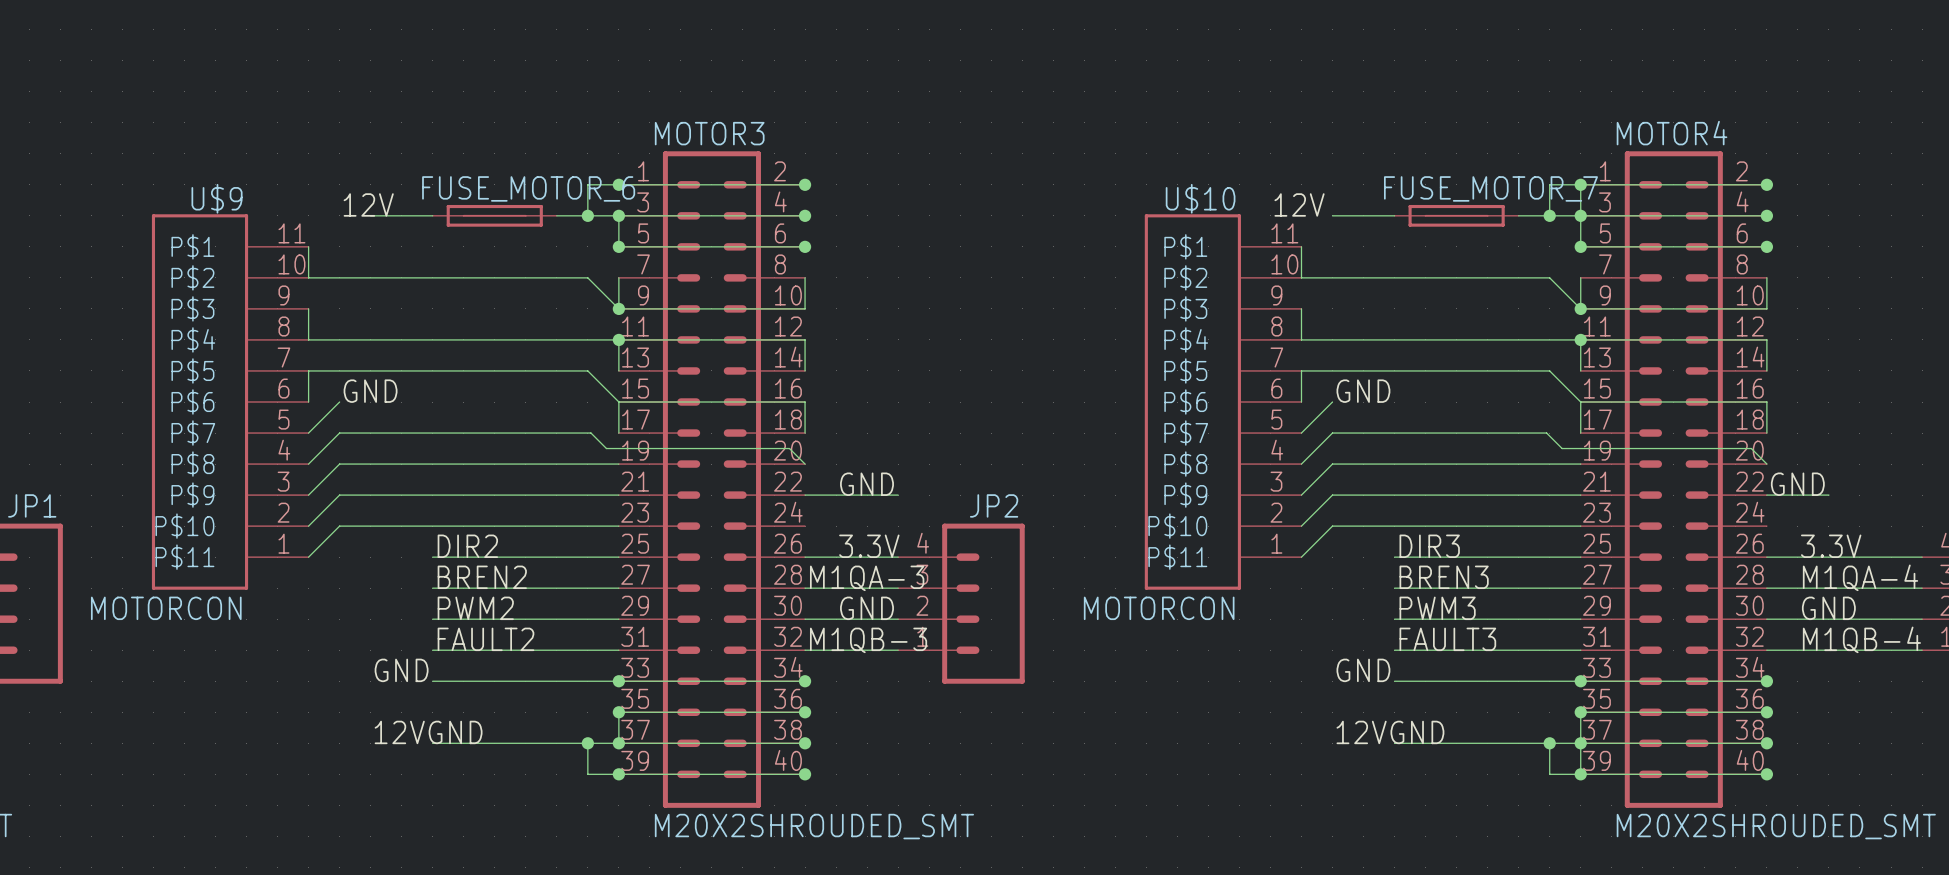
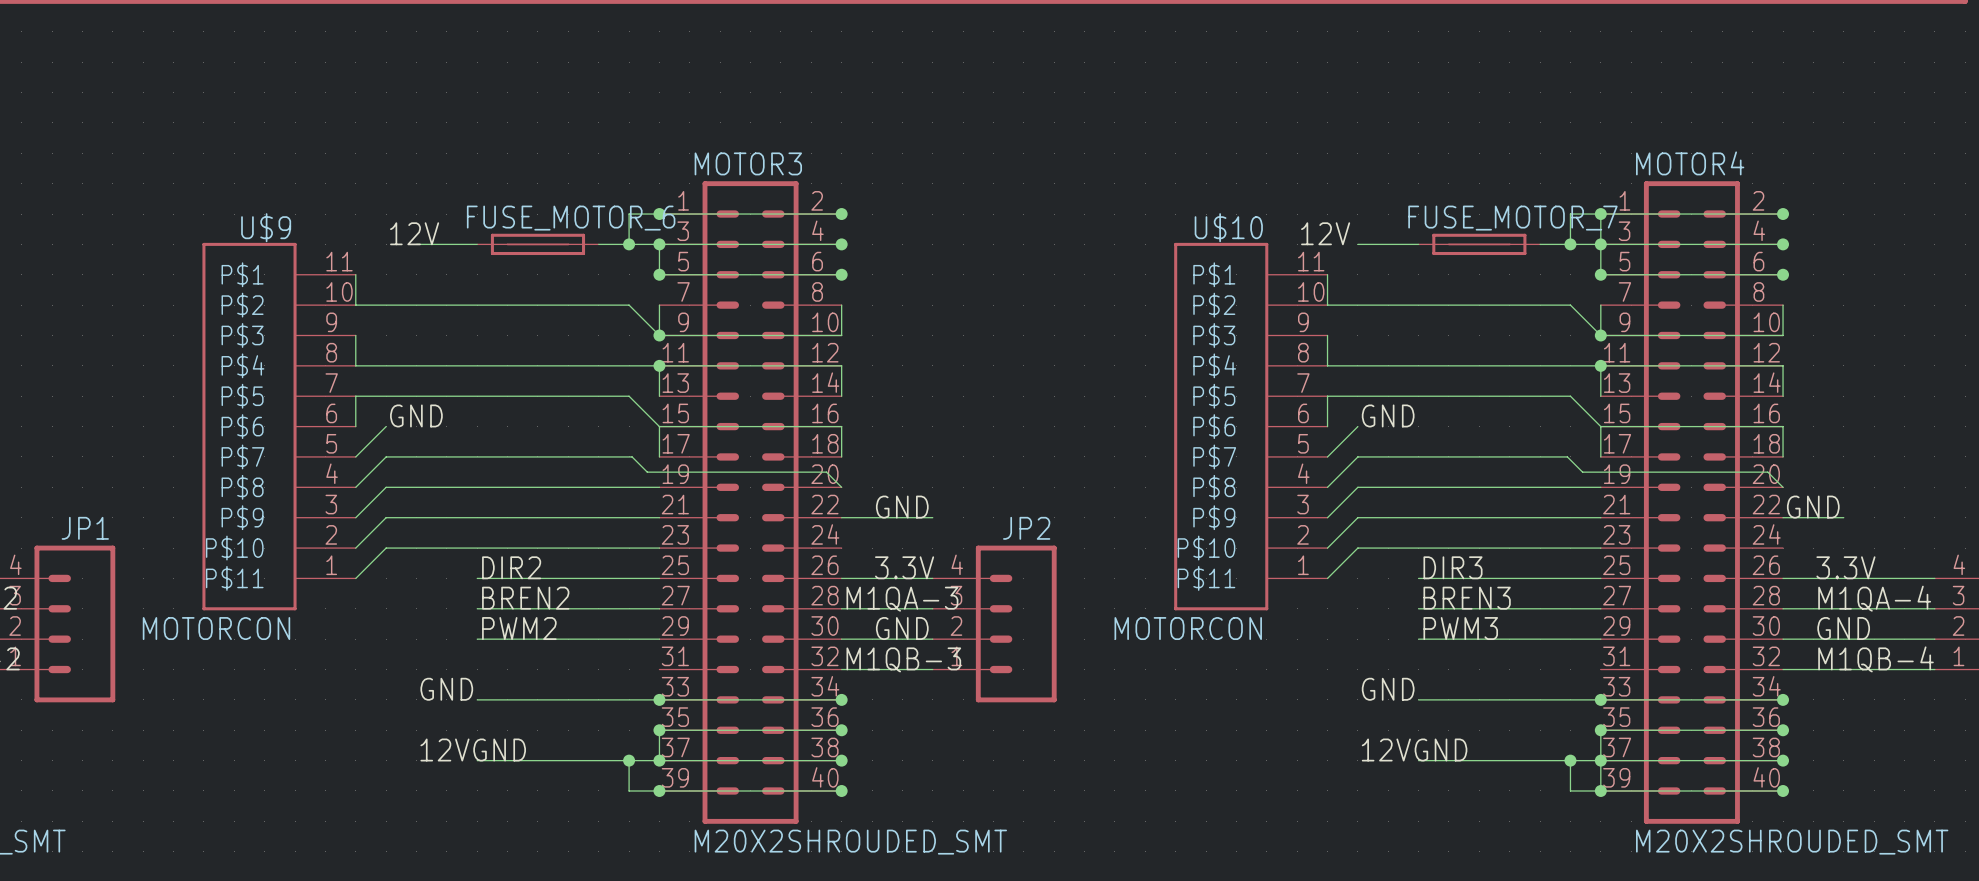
label: FAULT2 (485, 639) -> none
label: FAULT3 (1447, 639) -> none
wire: (432, 650) (618, 650) -> none
wire: (1394, 650) (1580, 650) -> none

